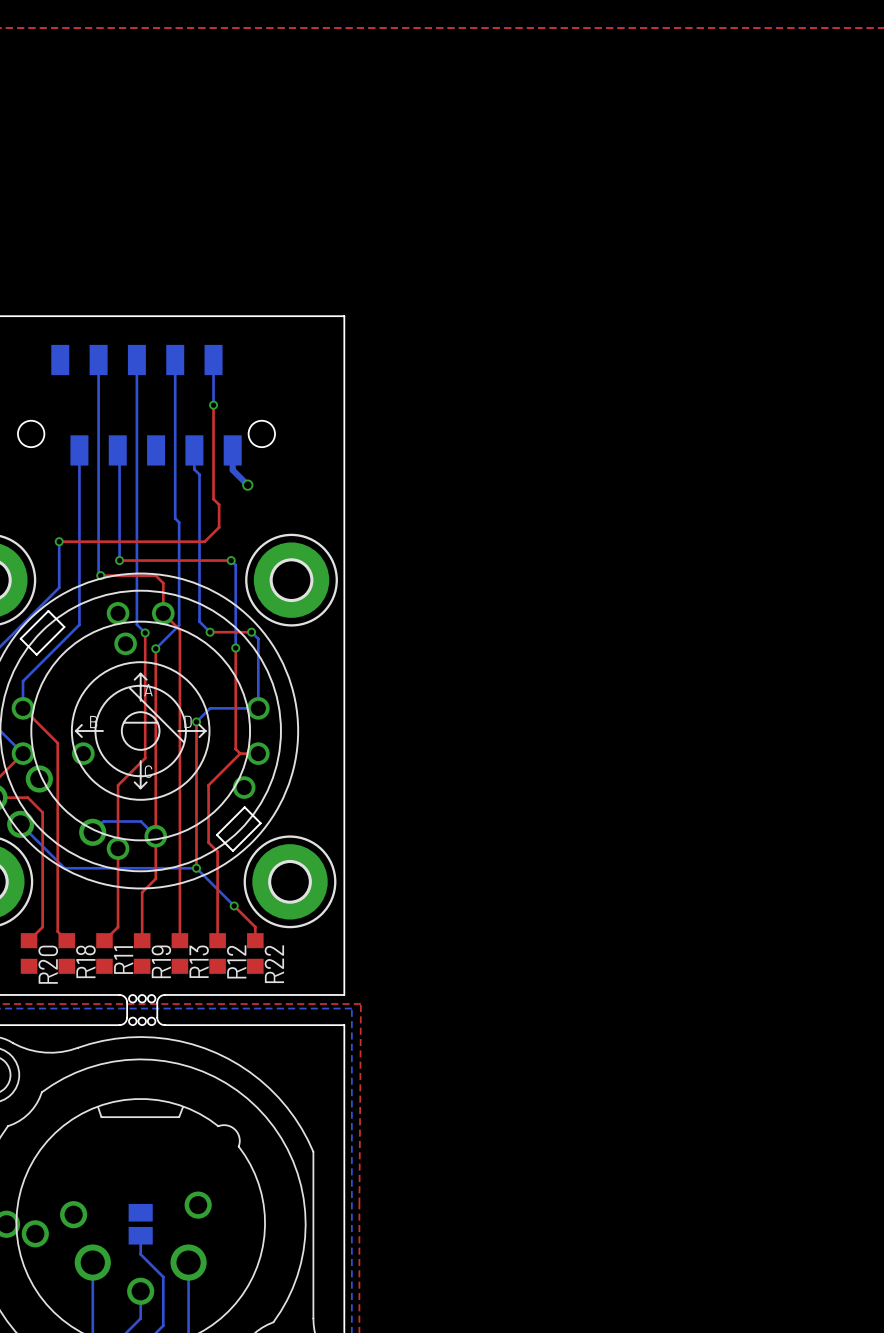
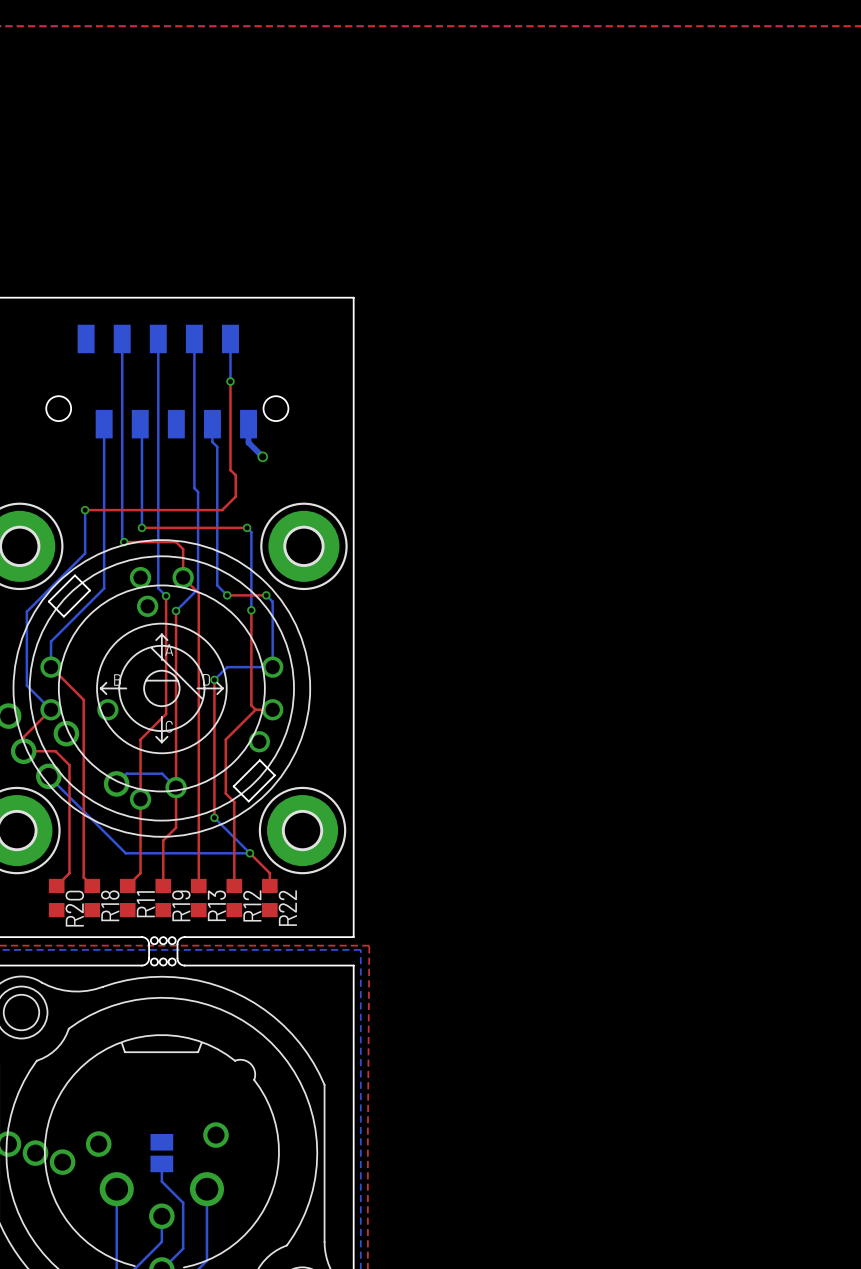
bottom track: (64, 868) (196, 868) -> (90, 817) (125, 853) (249, 853)

